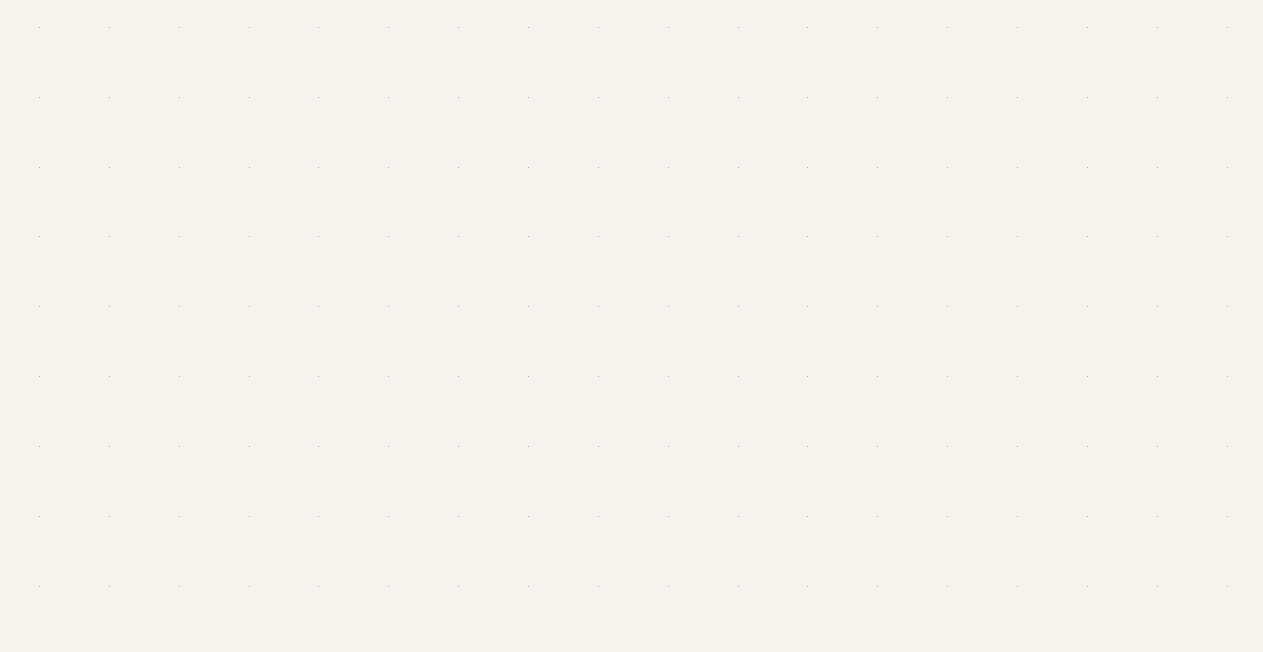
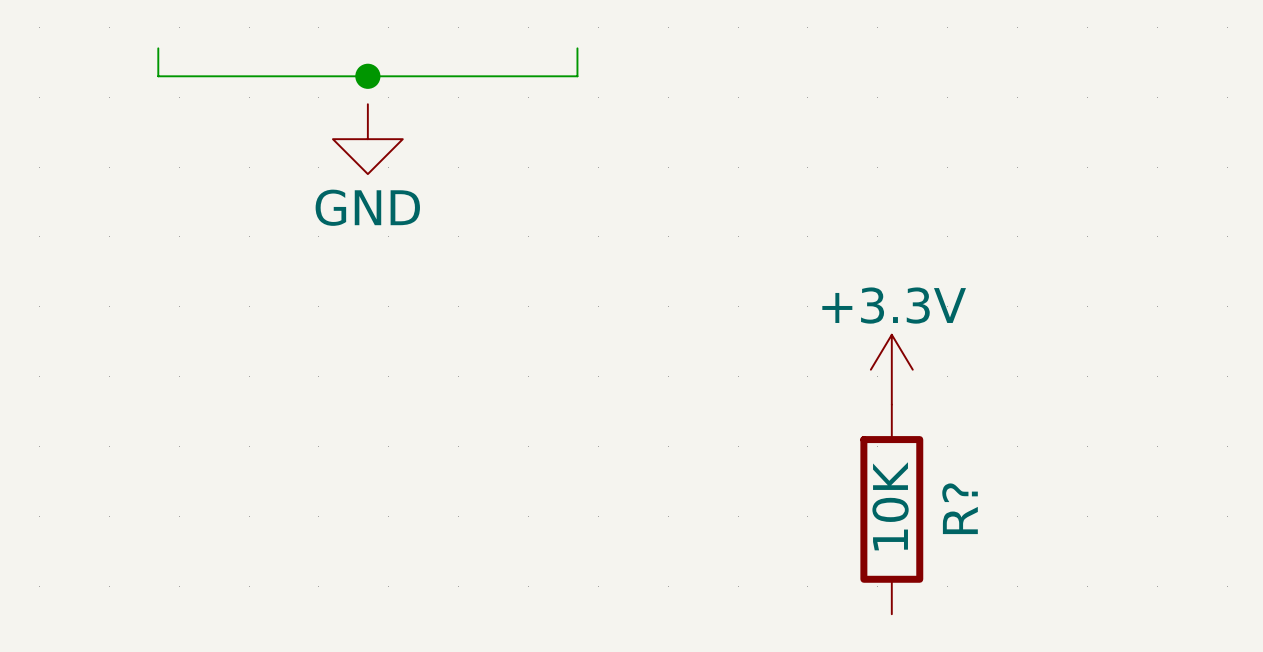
wire: none -> (158, 48) (158, 76) (577, 76) (577, 48)
junction: none -> (367, 76)
power symbol: none -> GND (367, 139)
power symbol: none -> +3.3V (891, 369)
R?: none -> 10K (891, 509)

